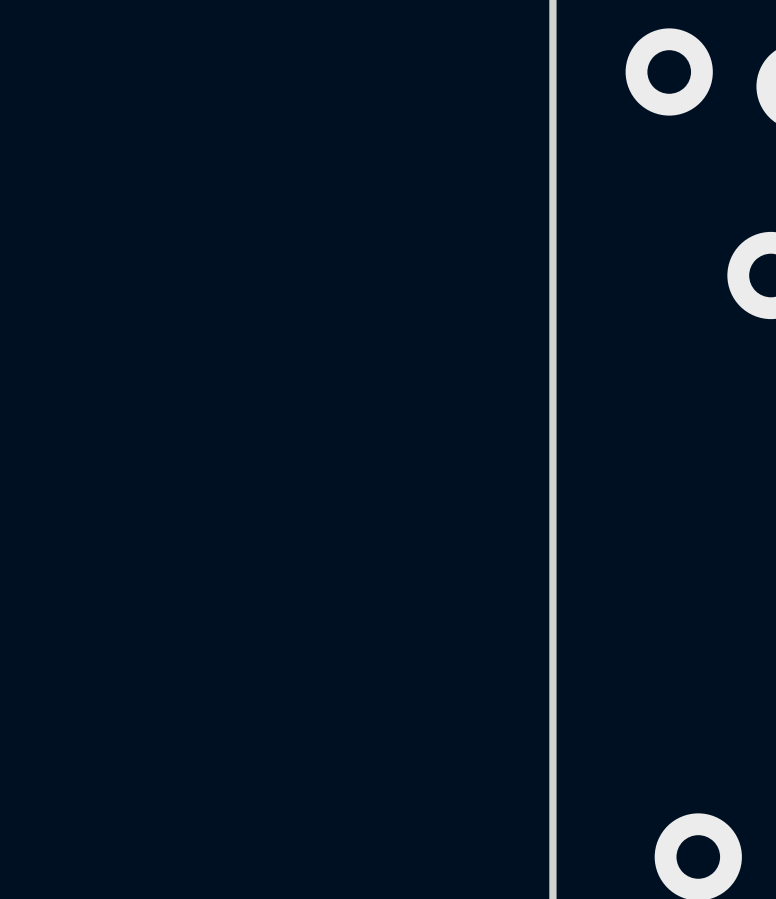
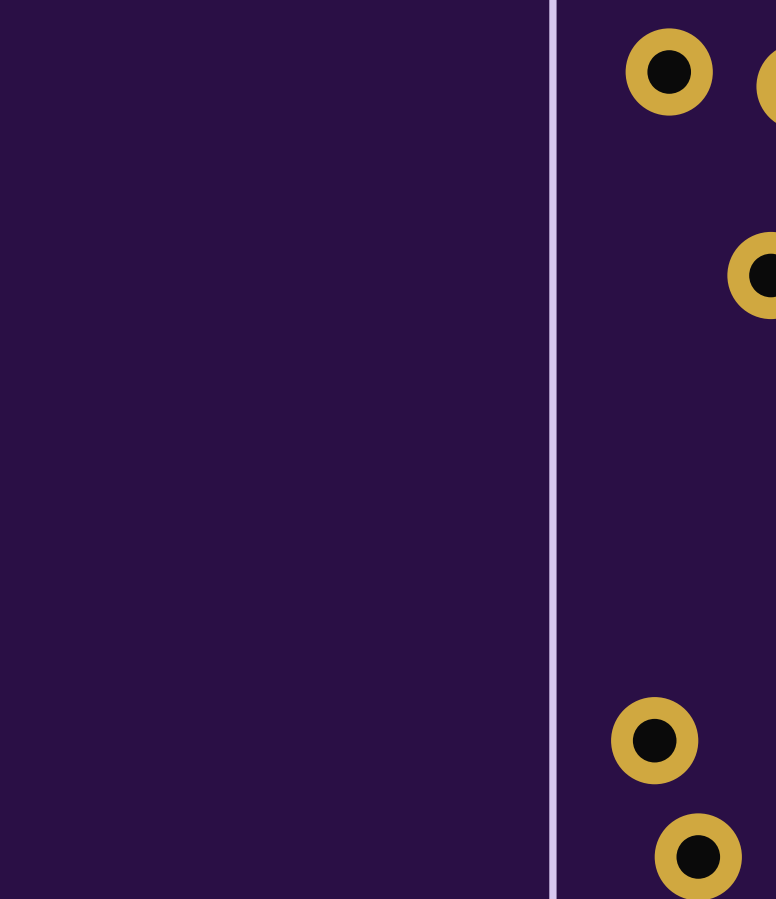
via: none -> (654, 740)

